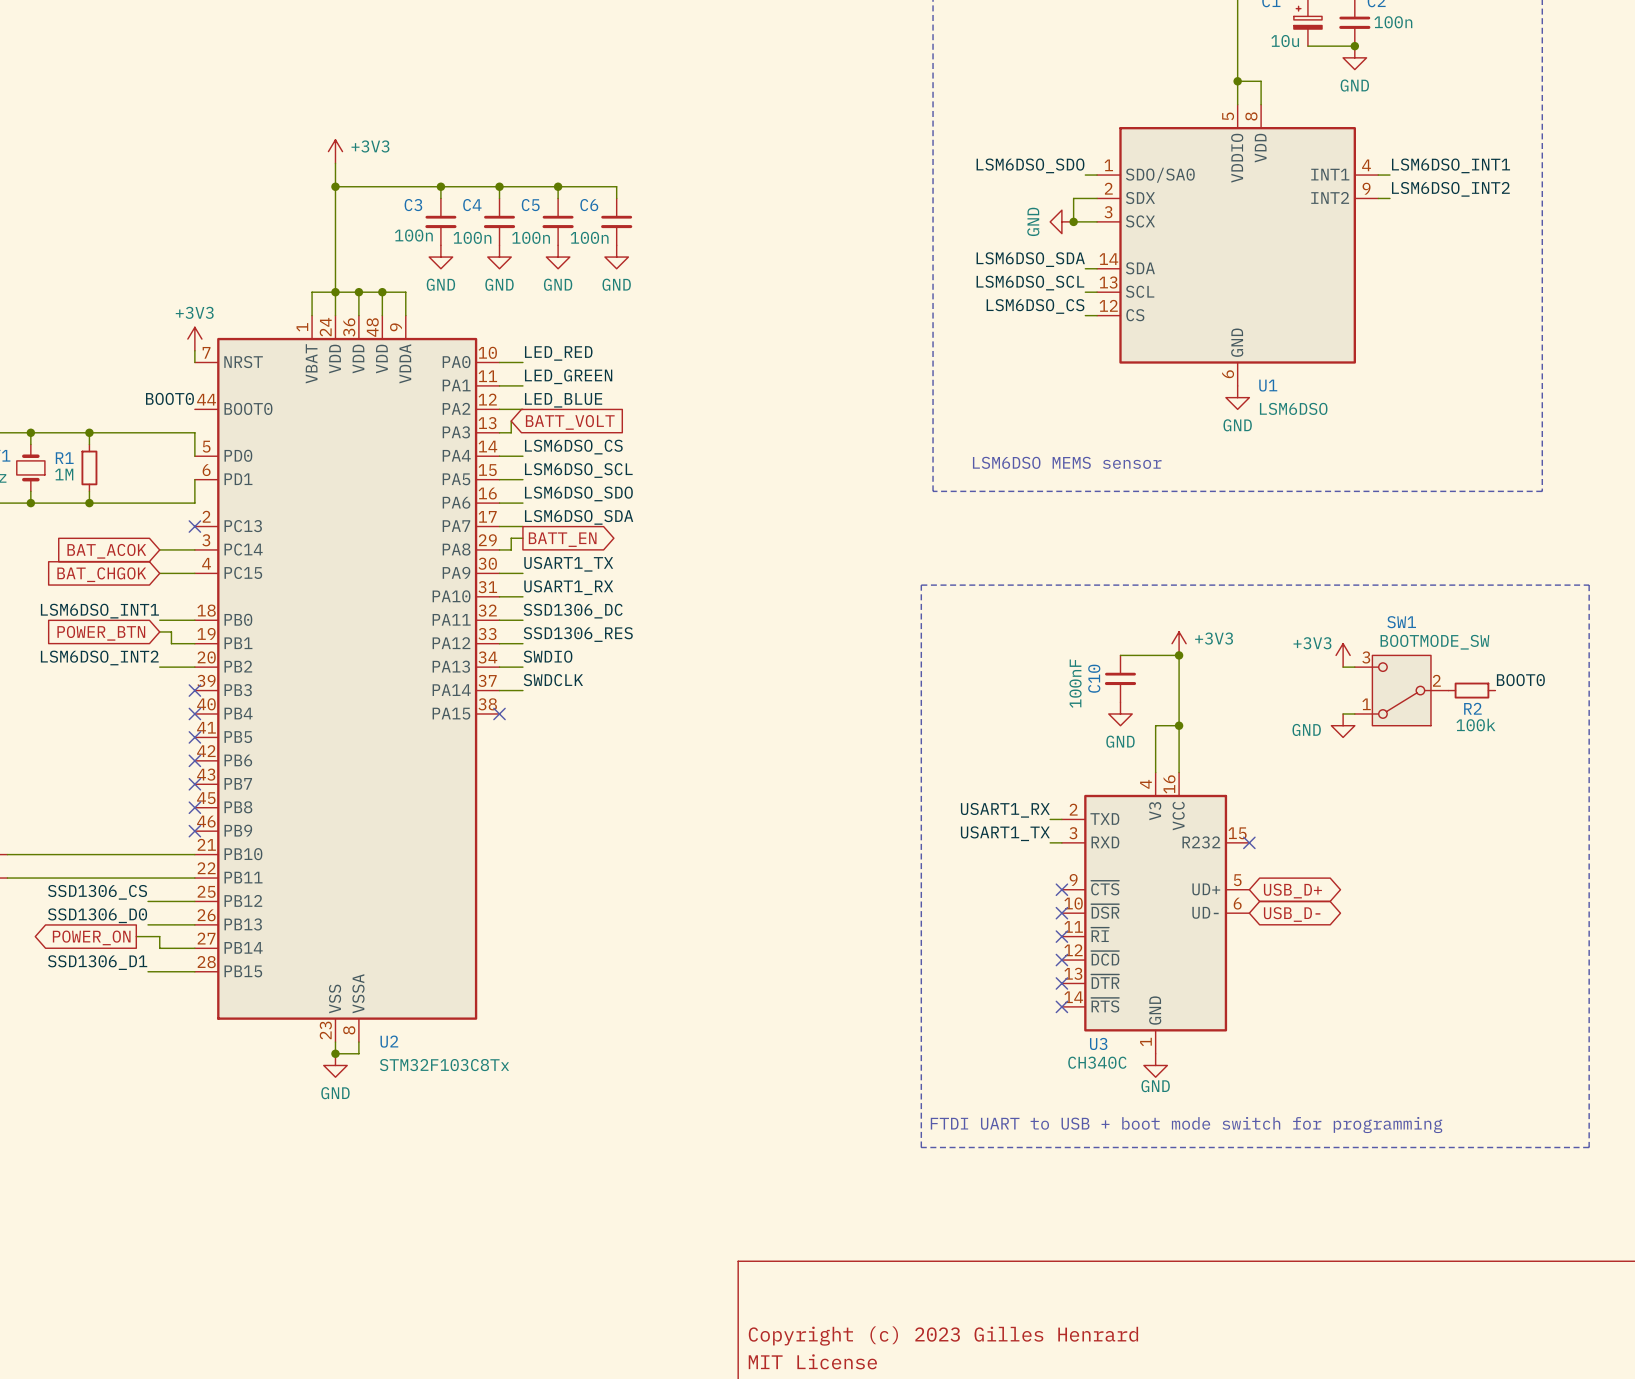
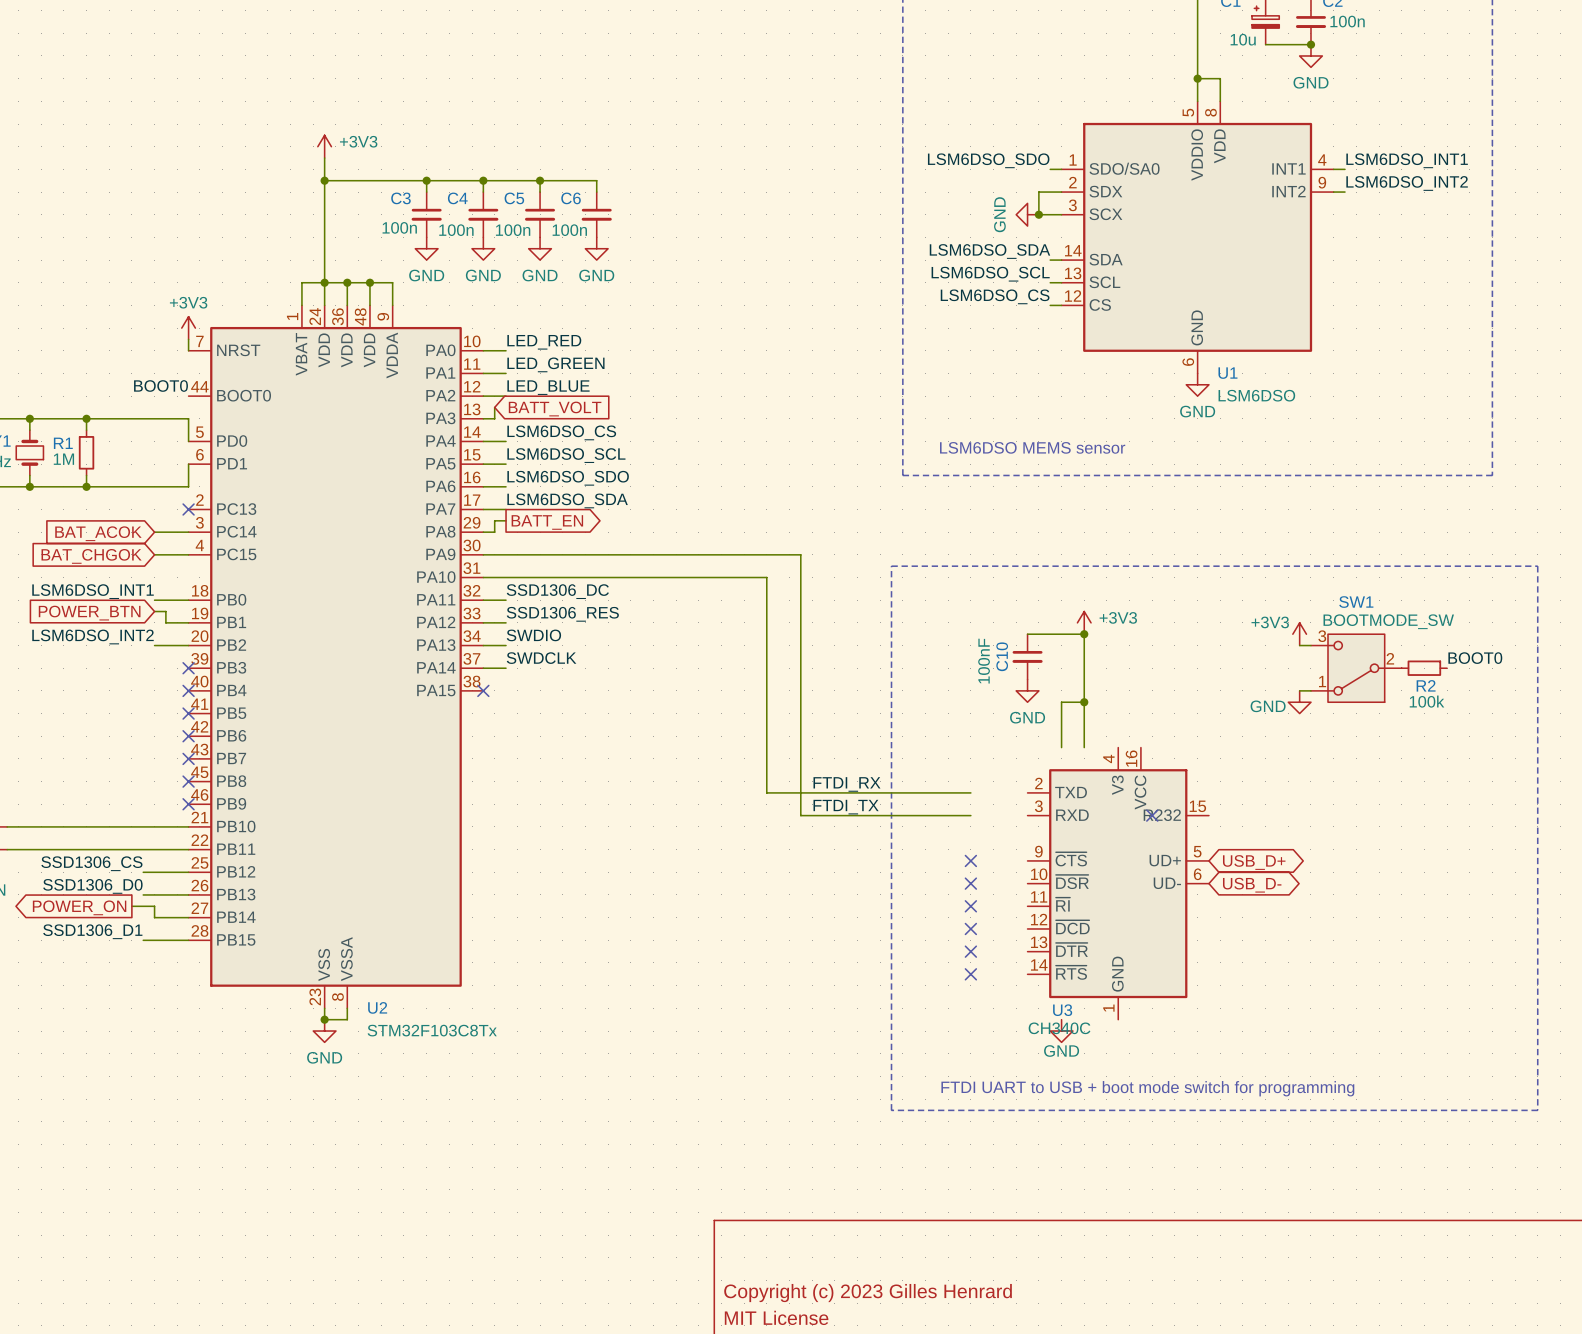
label: USART1_TX (568, 564) -> none
wire: none -> (506, 554) (800, 554) (800, 815) (970, 815)
label: USART1_RX (568, 587) -> none
wire: none -> (506, 577) (766, 577) (766, 792) (970, 792)
power symbol position: +3V3 (1179, 643) -> +3V3 (1084, 622)
wire: (1120, 655) (1179, 655) (1179, 772) -> (1027, 634) (1084, 634) (1084, 747)
junction: none -> (1084, 634)
junction: (1179, 655) -> none
C10 position: (1120, 678) -> (1027, 656)
power symbol position: GND (1120, 713) -> GND (1027, 690)
junction: none -> (1084, 702)
wire: (1179, 725) (1155, 725) (1155, 772) -> (1084, 702) (1061, 702) (1061, 747)
junction: (1179, 725) -> none
label: none -> FTDI_RX (846, 784)
label: USART1_RX (1005, 810) -> none
wire: (1050, 819) (1061, 819) -> none
label: none -> FTDI_TX (846, 807)
label: USART1_TX (1005, 833) -> none
wire: (1050, 842) (1061, 842) -> none
no-connect mark: none -> (1152, 815)
no-connect mark: (1249, 842) -> none
no-connect mark: none -> (970, 860)
no-connect mark: (1061, 889) -> none
no-connect mark: none -> (970, 883)
no-connect mark: (1061, 913) -> none
no-connect mark: none -> (970, 906)
no-connect mark: (1061, 936) -> none
no-connect mark: none -> (970, 928)
no-connect mark: (1061, 960) -> none
no-connect mark: none -> (970, 951)
no-connect mark: (1061, 983) -> none
no-connect mark: none -> (970, 974)
no-connect mark: (1061, 1006) -> none
power symbol position: GND (1155, 1065) -> GND (1061, 1031)

